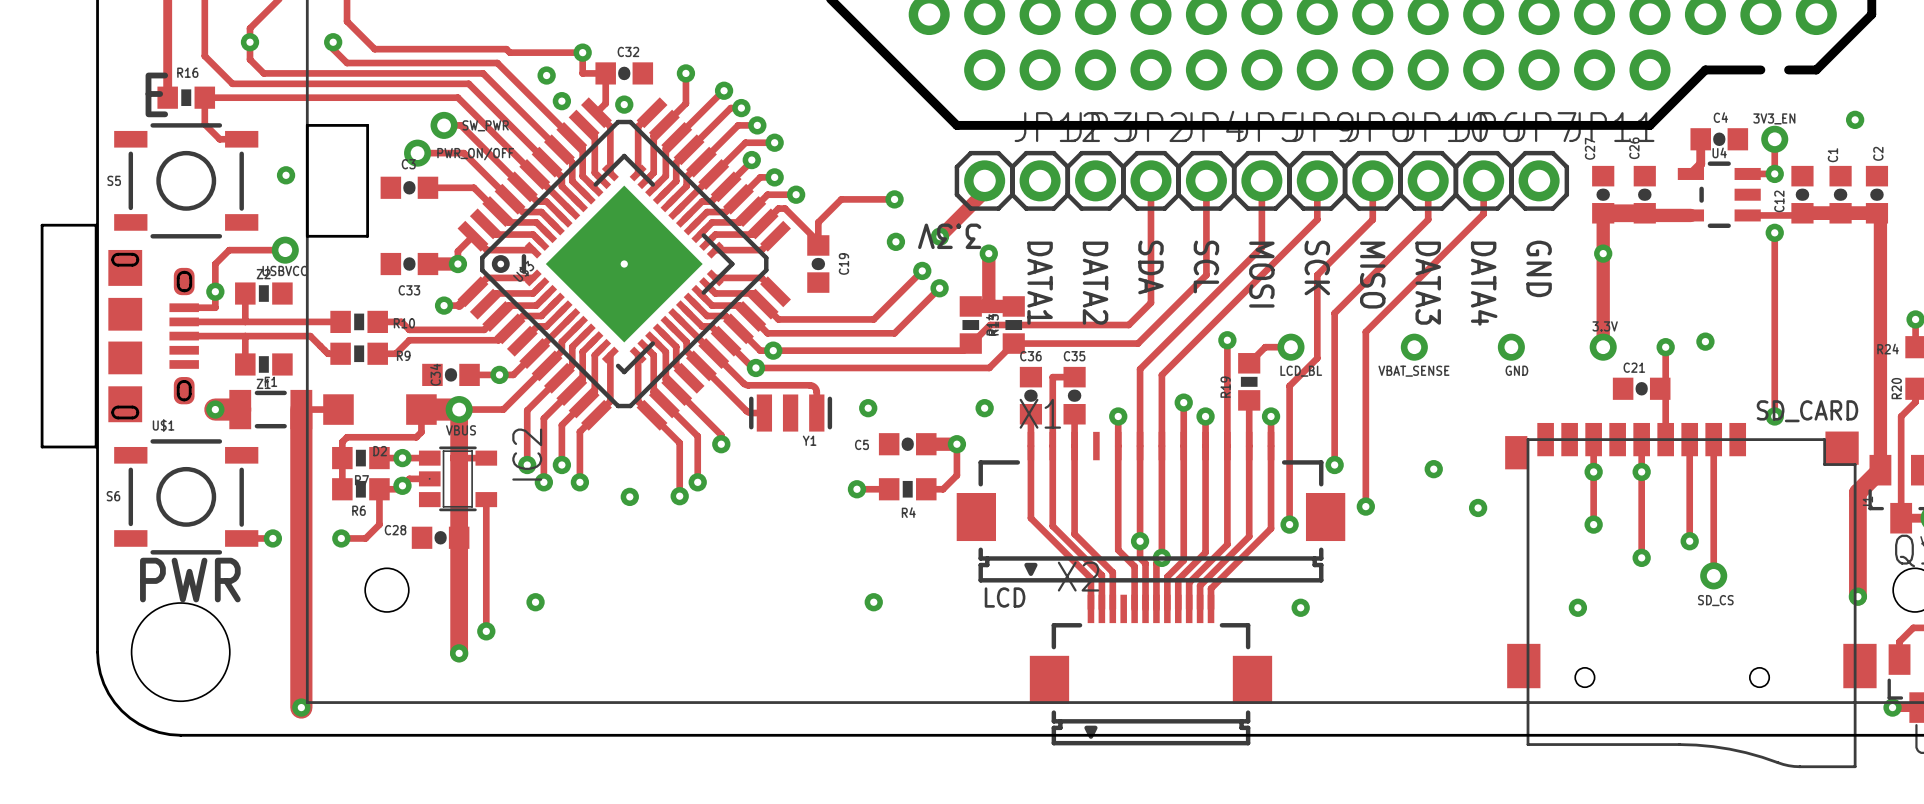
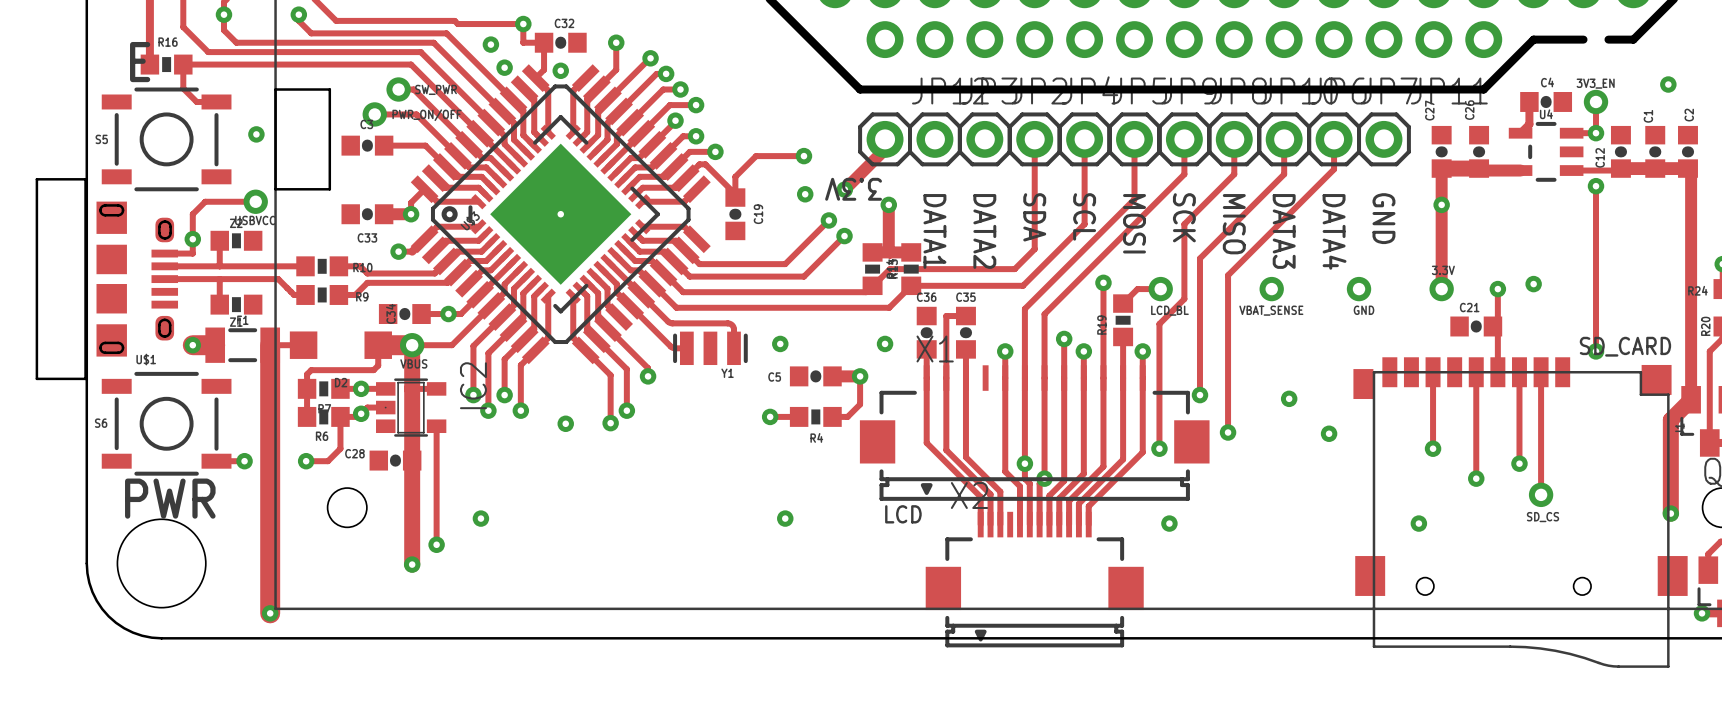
via: (773, 350) -> none
via: (755, 367) -> none
via: (1593, 471) -> none
via: (1641, 471) -> none

